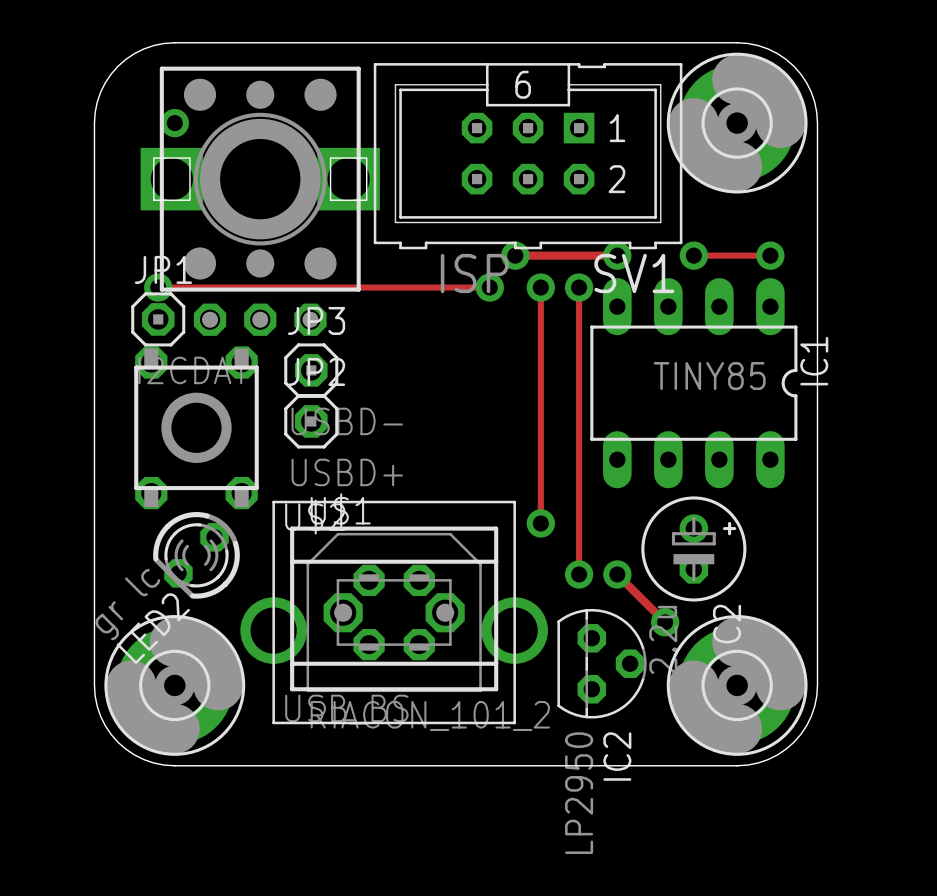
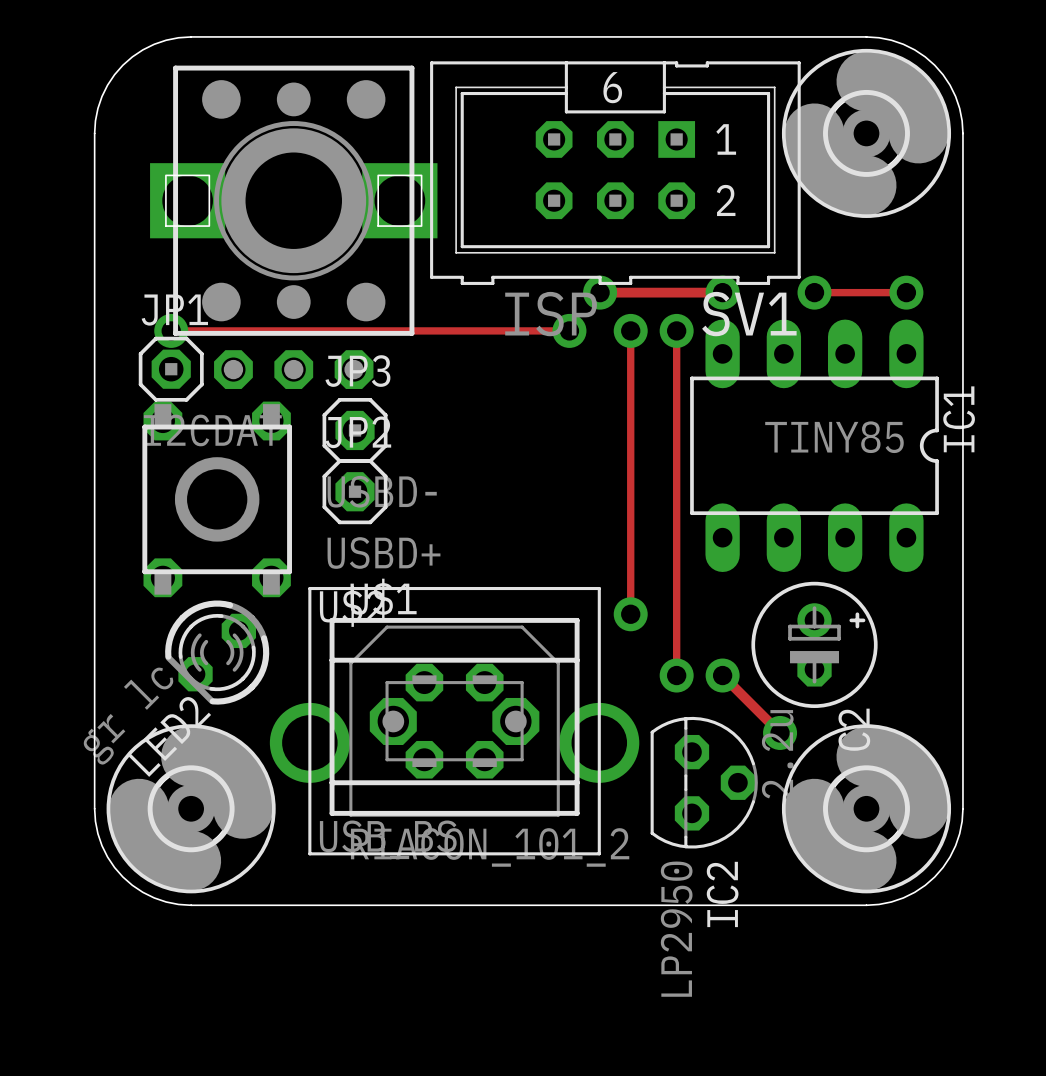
part footprint: [666, 52, 808, 194] -> [781, 48, 952, 218]
via: (174, 123) -> none
part footprint: [104, 615, 246, 756] -> [106, 724, 276, 894]
part footprint: [666, 615, 808, 756] -> [781, 724, 952, 894]

